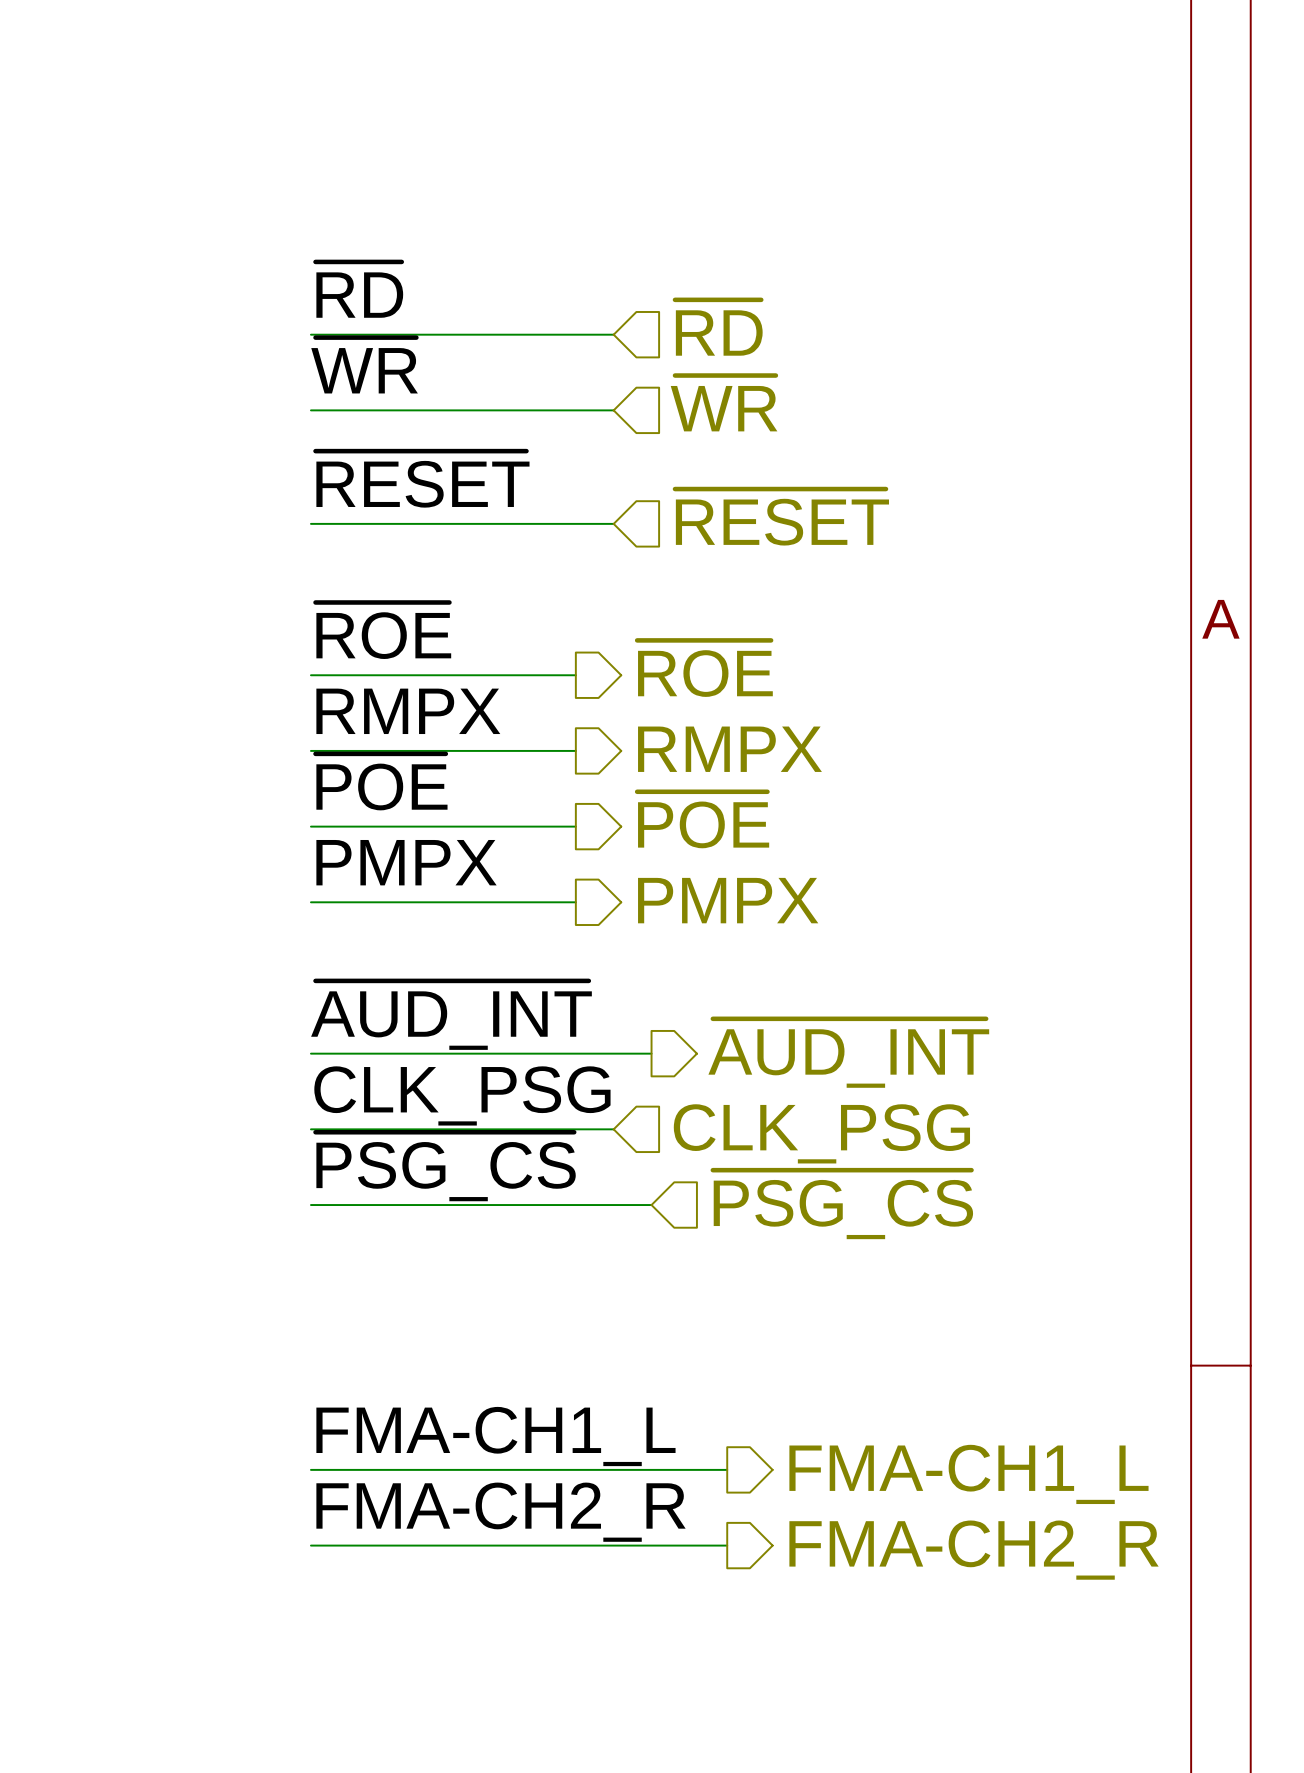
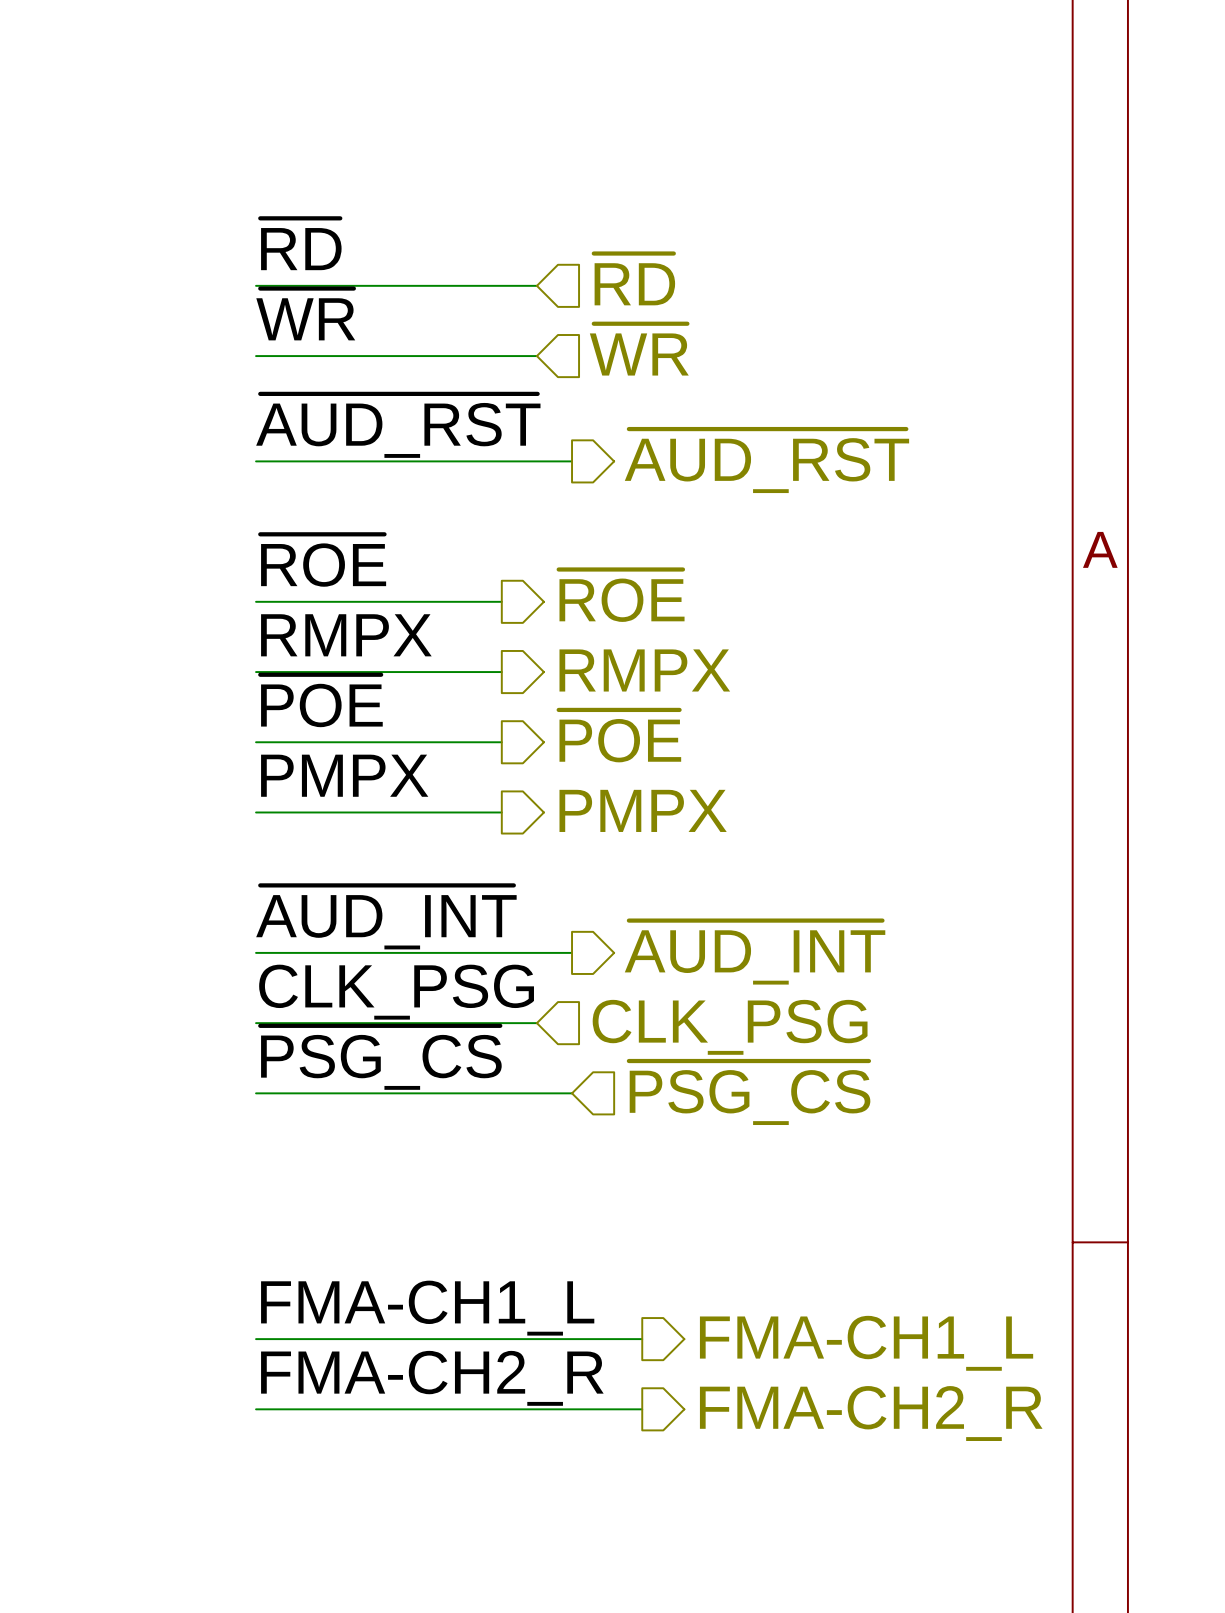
label: ~{RESET} (422, 479) -> ~{AUD_RST} (398, 425)
hierarchical label shape: input (782, 517) -> output (766, 461)
hierarchical label: ~{RESET} (782, 517) -> ~{AUD_RST} (766, 461)
wire: none -> (536, 461) (572, 461)

